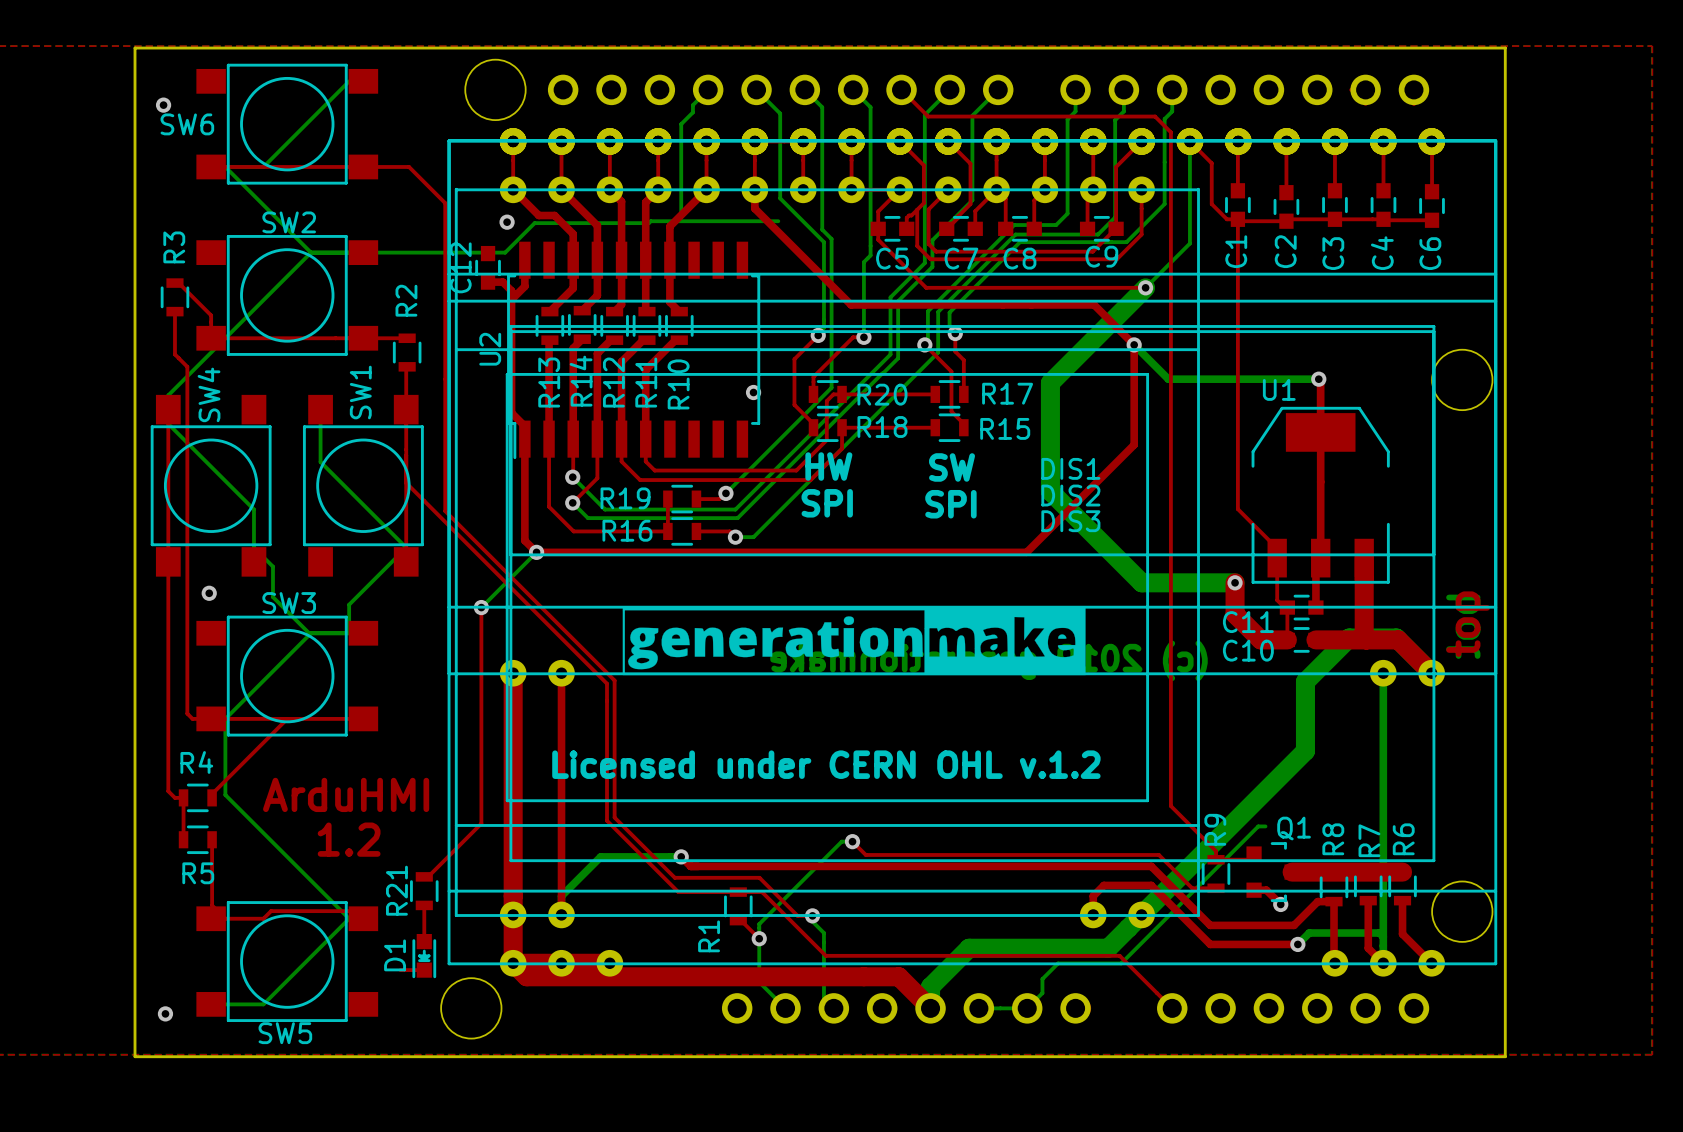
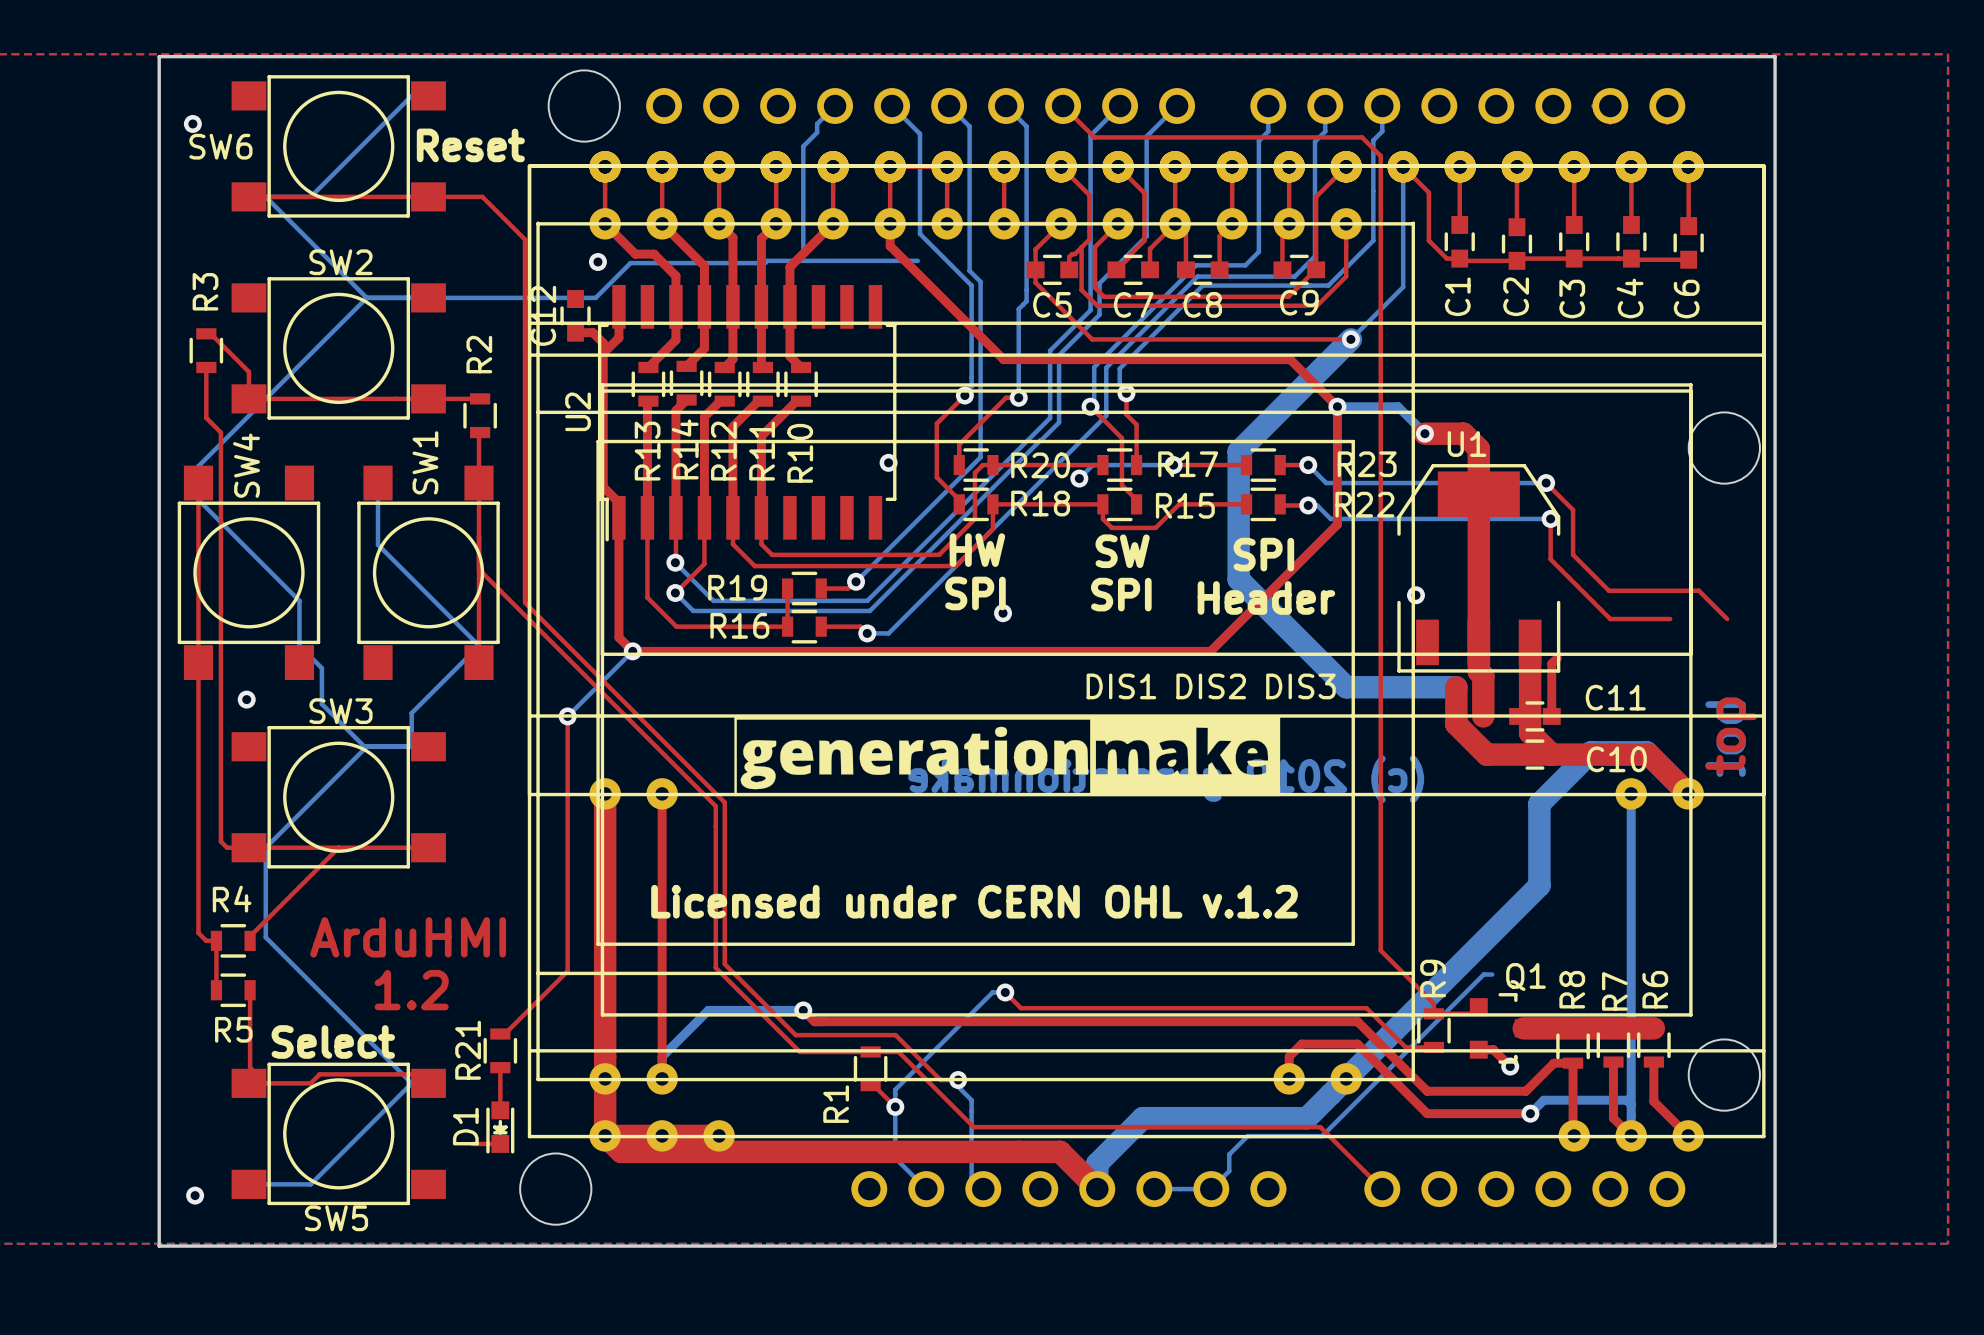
text: none -> Reset (470, 145)
top track: (1237, 219) (1237, 509) (1277, 548) (1277, 600) (1284, 607) (1287, 607) (1287, 639) -> (1530, 642) (1530, 732) (1551, 754) (1518, 754)
bottom track: (1134, 344) (1168, 379) (1318, 379) -> (1337, 406) (1398, 406) (1424, 433)
top track: none -> (1424, 433) (1463, 433) (1478, 448) (1478, 671) (1483, 676) (1483, 716)
via: none -> (1424, 433)
top track: (1318, 379) (1318, 430) (1320, 432) (1320, 558) (1320, 381) (1318, 379) -> none
via: (1318, 379) -> none
U1 name position: U1 (1279, 389) -> U1 (1467, 444)
top track: none -> (1173, 465) (1246, 465)
bottom track: none -> (1173, 465) (1092, 465) (1079, 478)
via: none -> (1173, 465)
R23: none -> (1263, 465)
top track: none -> (1280, 465) (1308, 465)
bottom track: none -> (1308, 465) (1326, 483) (1546, 483)
via: none -> (1308, 465)
via: none -> (1079, 478)
top track: none -> (1546, 483) (1573, 509) (1573, 554) (1608, 590) (1698, 590) (1727, 619)
via: none -> (1546, 483)
top track: none -> (1102, 504) (1102, 518) (1111, 527) (1155, 527) (1179, 504) (1246, 504)
R22: none -> (1263, 504)
top track: none -> (1280, 504) (1308, 505)
bottom track: none -> (1308, 505) (1317, 505) (1330, 518) (1550, 518)
via: none -> (1308, 505)
top track: none -> (1550, 518) (1550, 559) (1610, 619) (1670, 619)
via: none -> (1550, 518)
DIS1 name position: DIS1 (1070, 468) -> DIS1 (1121, 686)
text: none -> SPI (1263, 554)
DIS2 name position: DIS2 (1070, 495) -> DIS2 (1211, 686)
U1 position: (1320, 495) -> (1478, 568)
via: none -> (1415, 595)
text: none -> Header (1266, 597)
via: none -> (1003, 613)
DIS3 name position: DIS3 (1070, 521) -> DIS3 (1300, 686)
top track: (1364, 558) (1364, 637) (1366, 639) -> none
via: (1235, 582) -> none
C11 name position: C11 (1248, 622) -> C11 (1615, 697)
C10 name position: C10 (1248, 650) -> C10 (1616, 759)
text: none -> Select (333, 1041)

